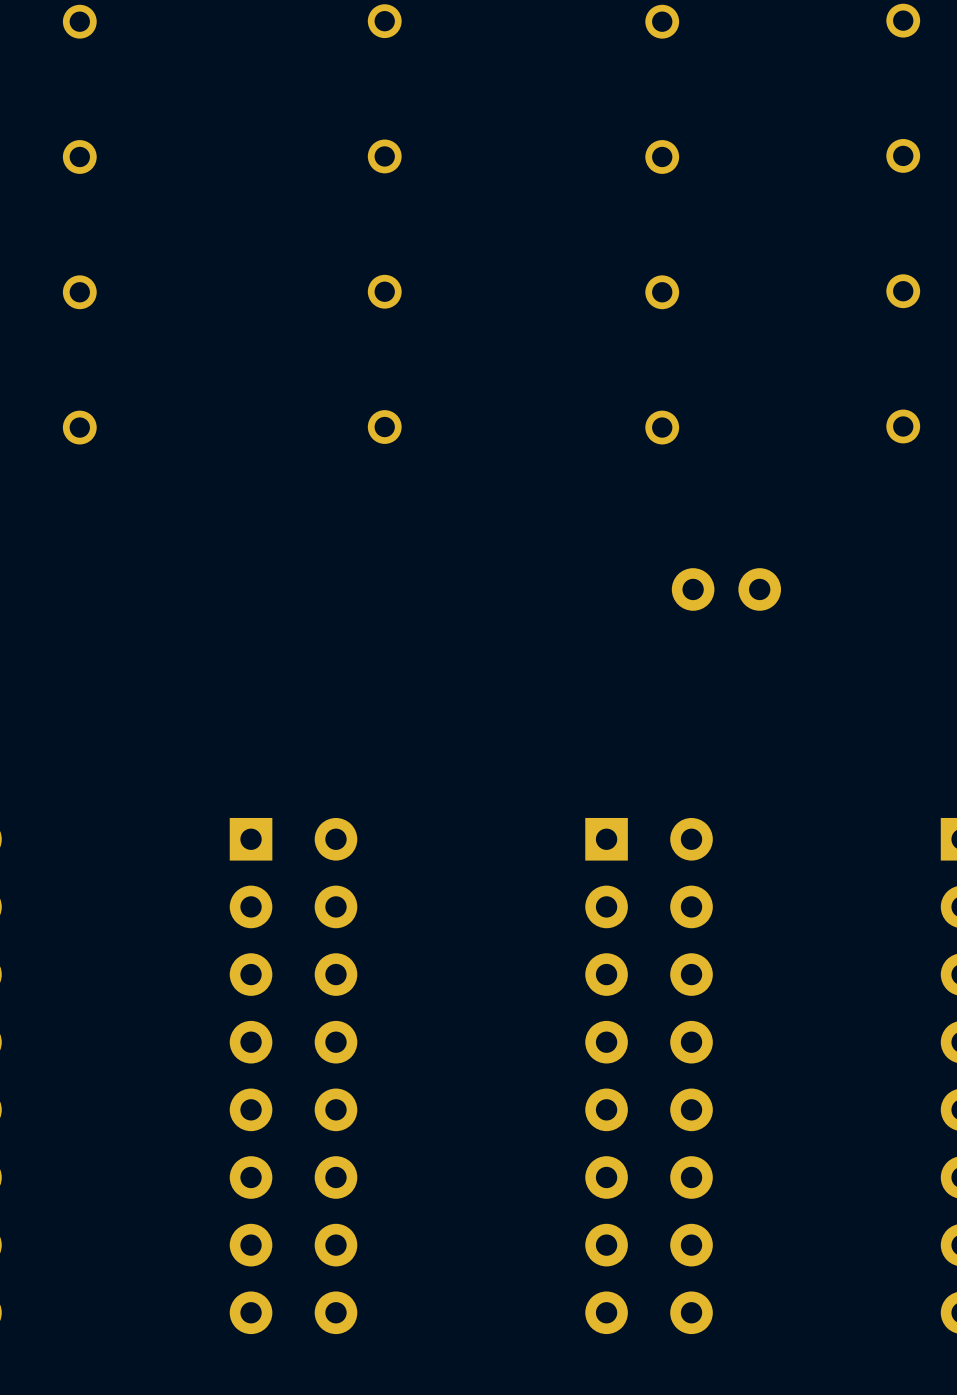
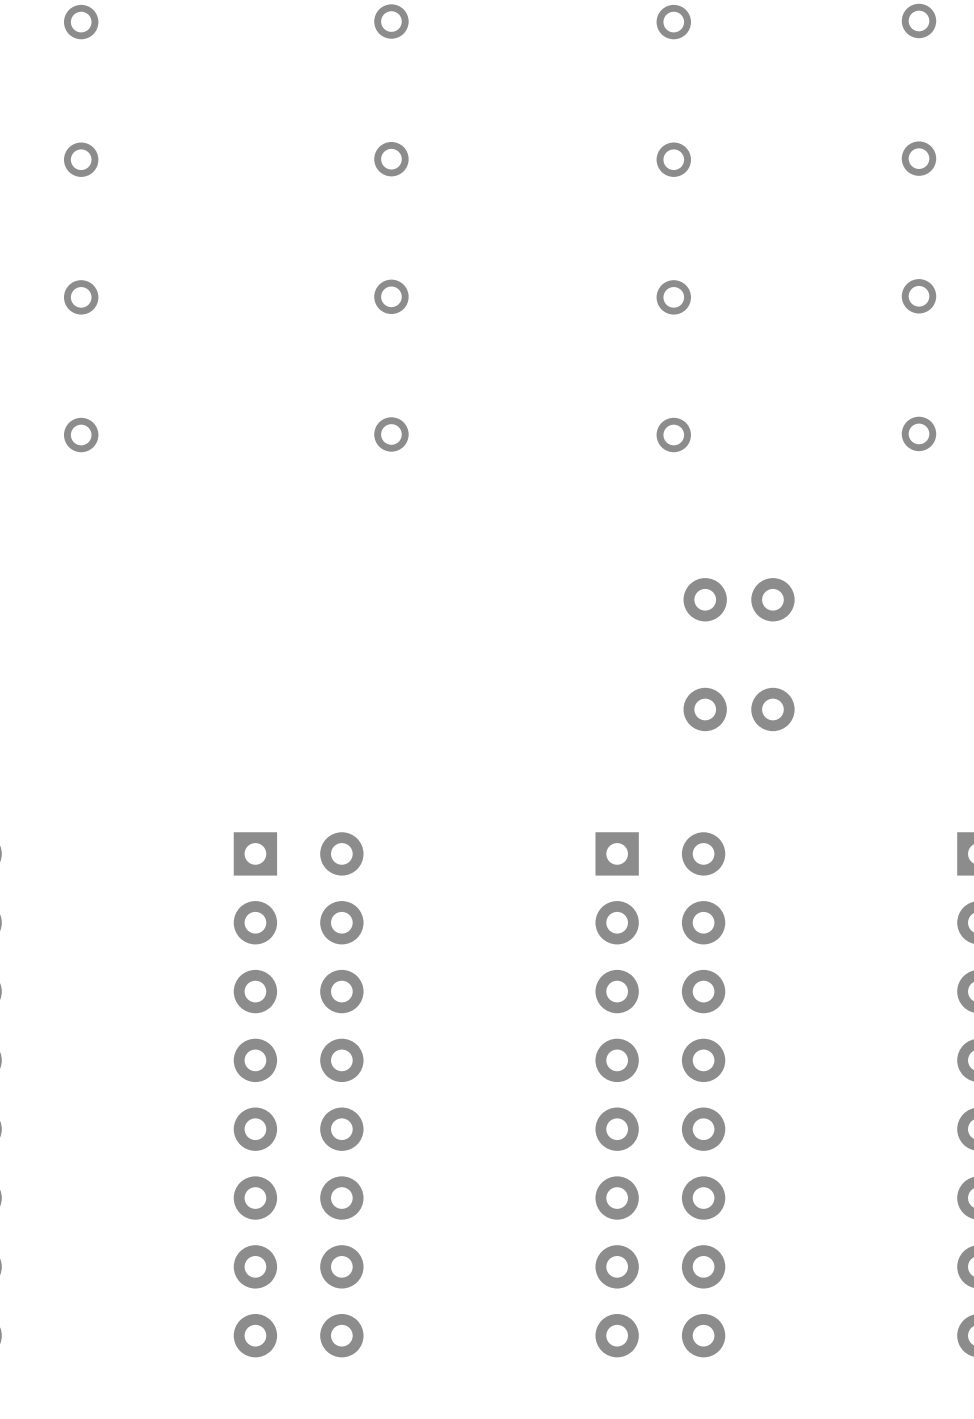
part: none -> (739, 709)

